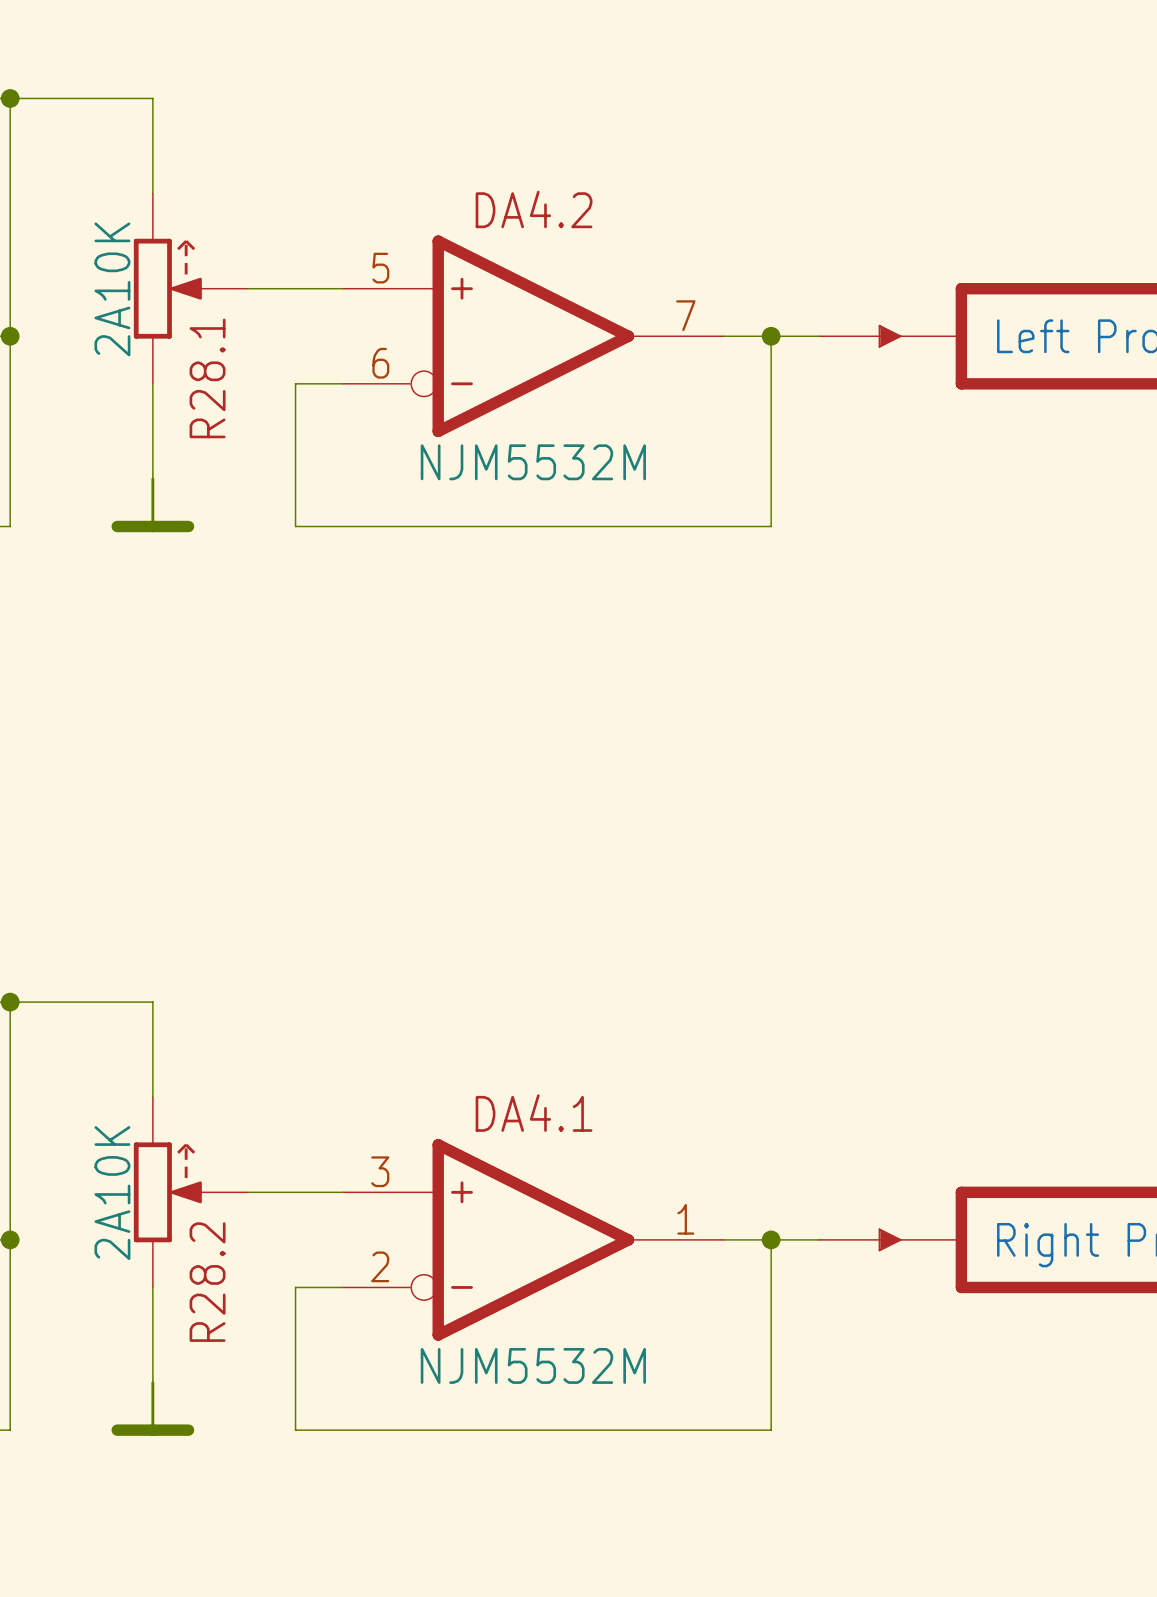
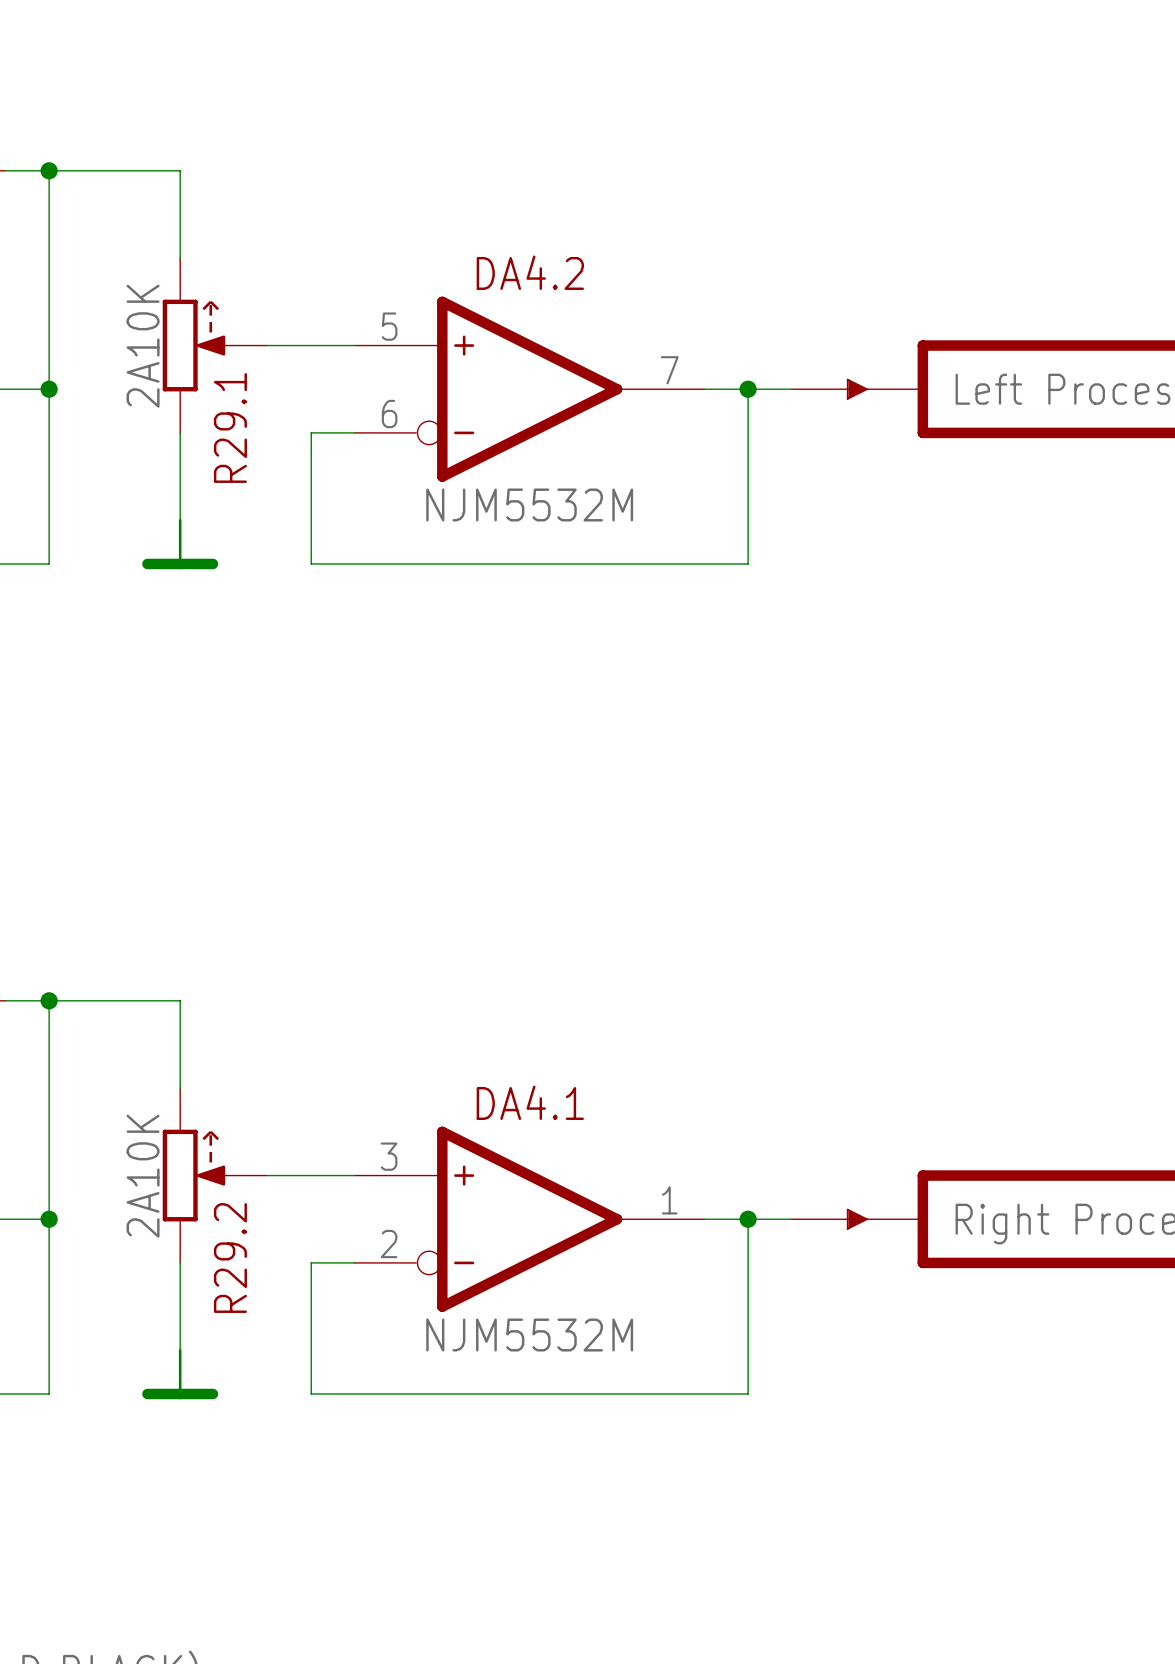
R28.1 name: R28.1 (207, 378) -> R29.1 (230, 427)
R28.2 name: R28.2 (207, 1282) -> R29.2 (230, 1257)

